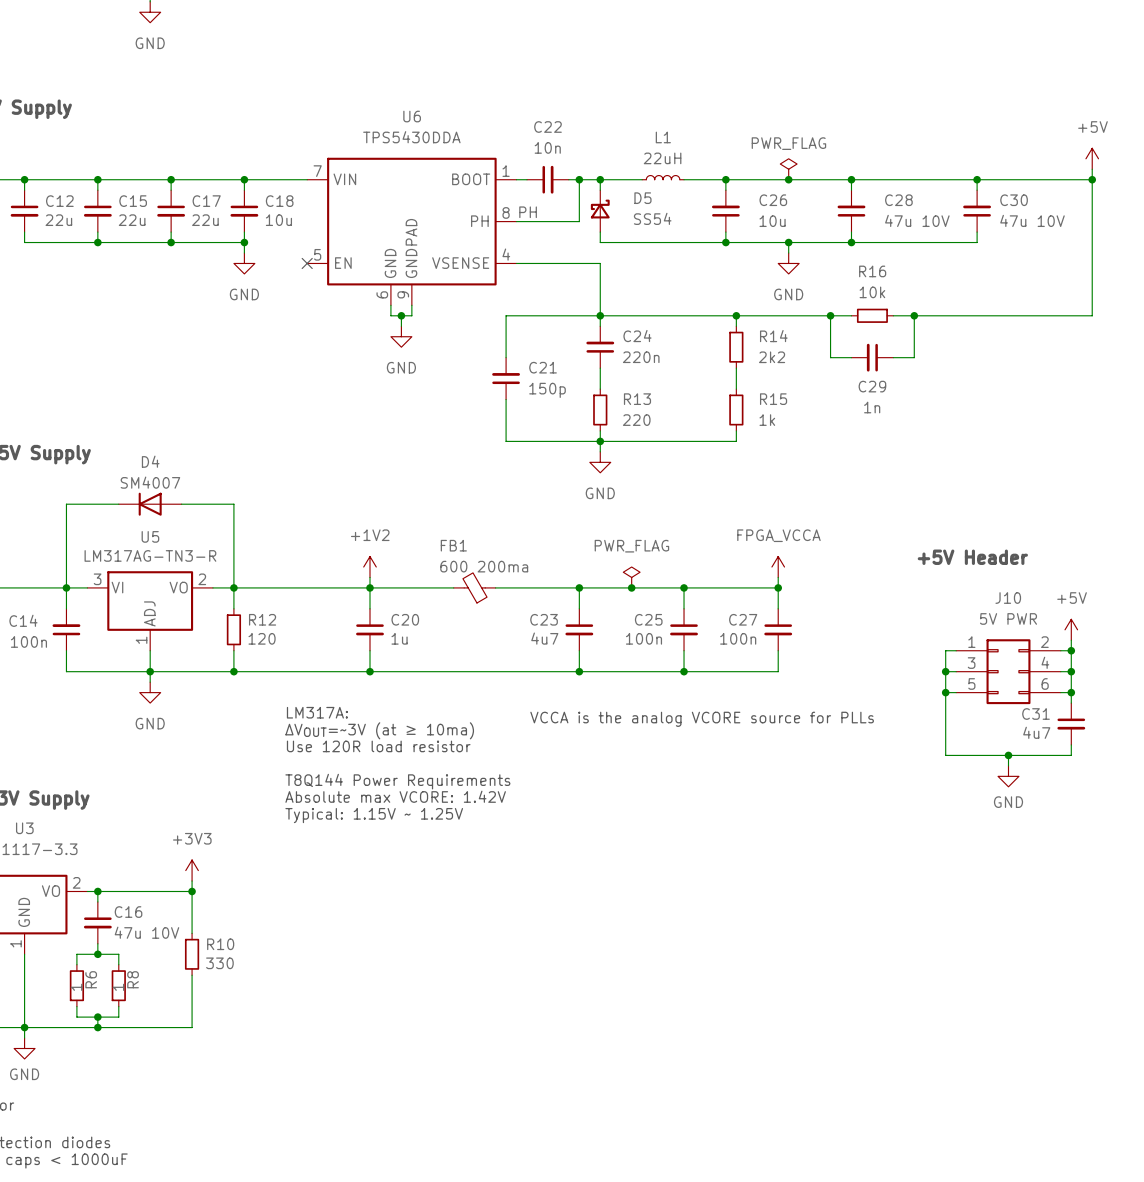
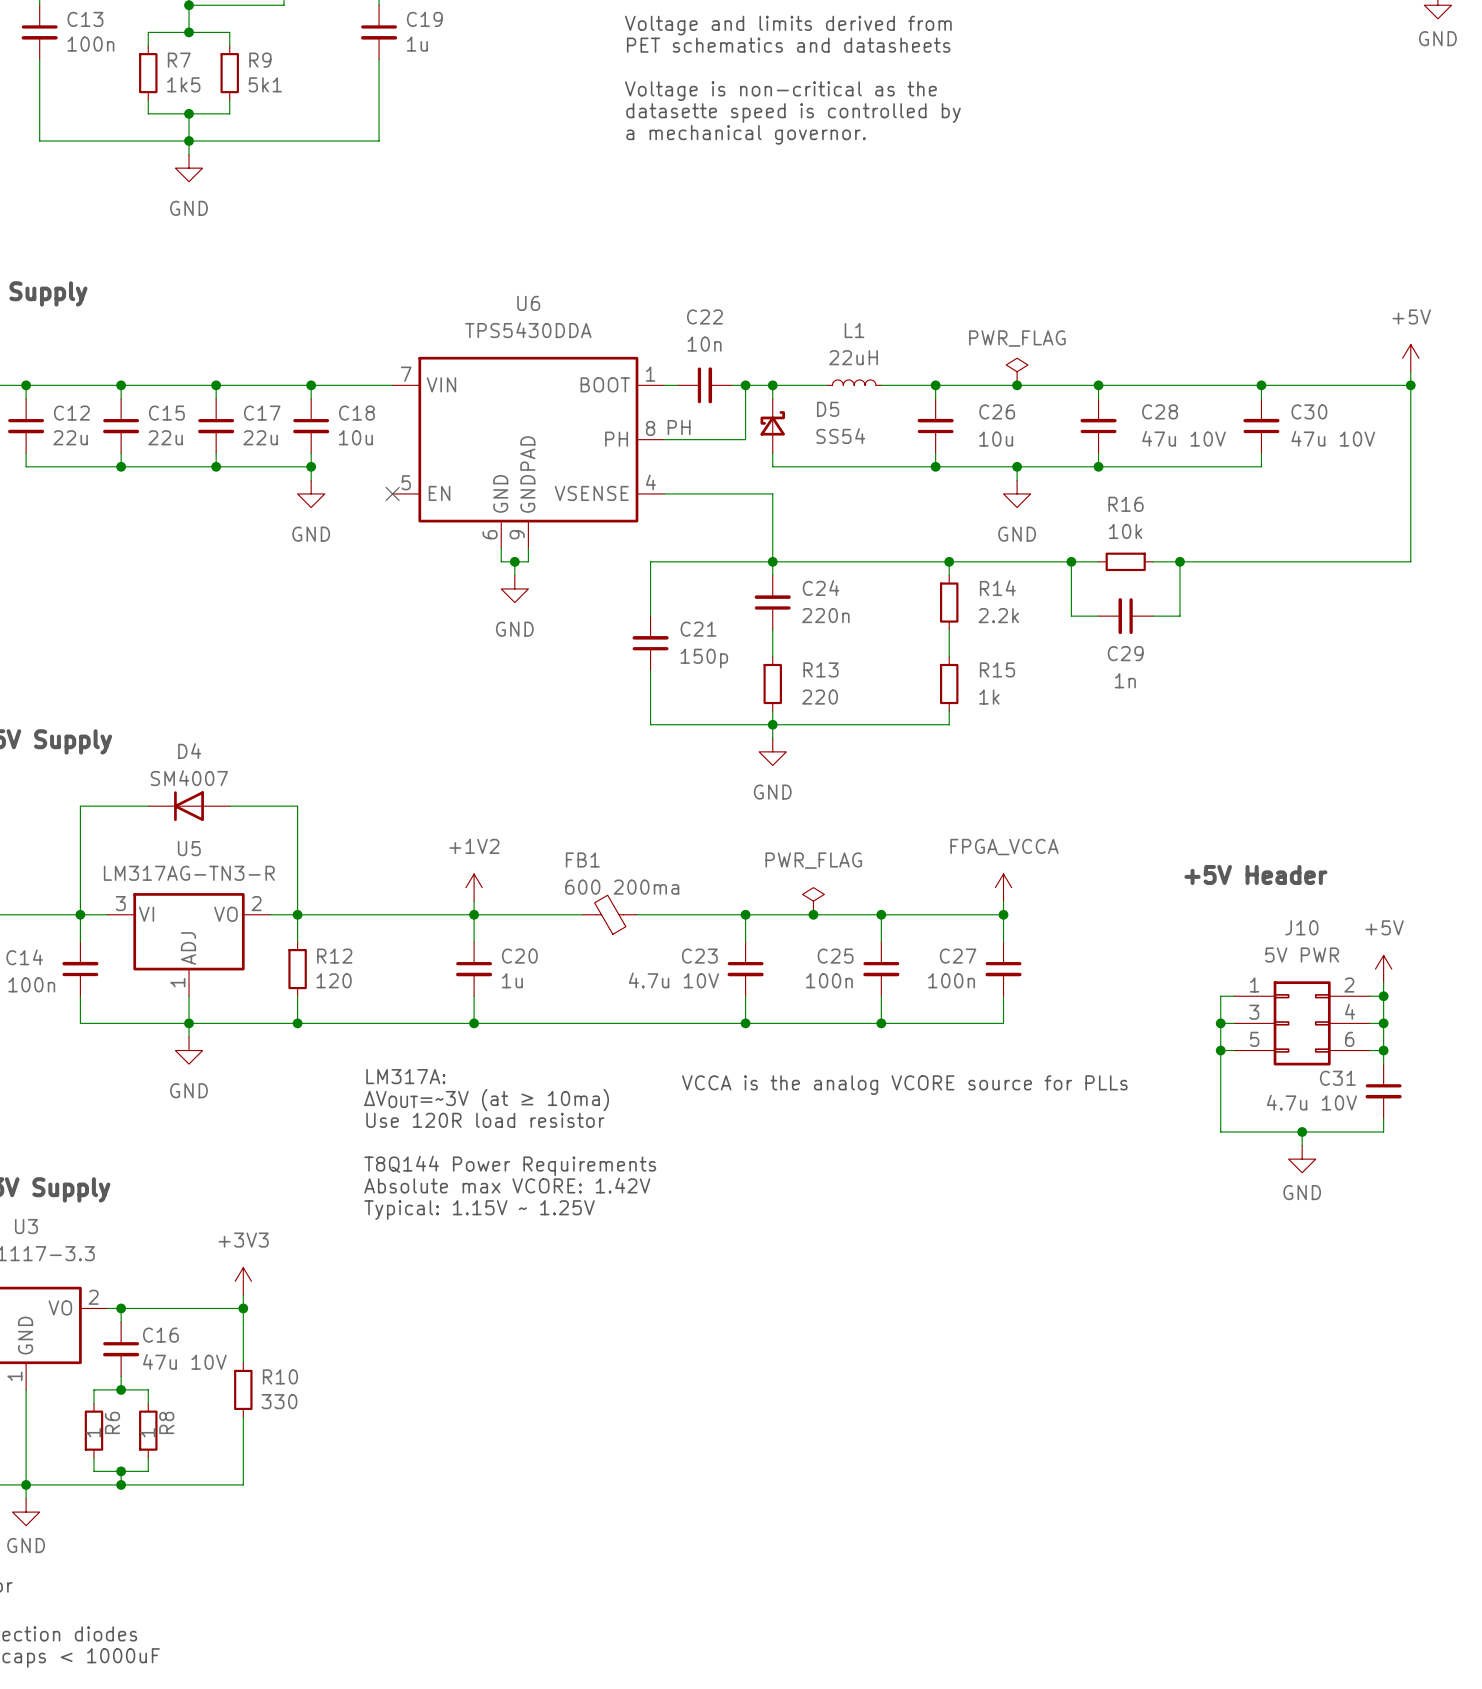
R14 value: 2k2 (772, 357) -> 2.2k (998, 615)
C23 value: 4u7 (544, 638) -> 4.7u 10V (673, 980)
C31 value: 4u7 (1036, 732) -> 4.7u 10V (1312, 1102)

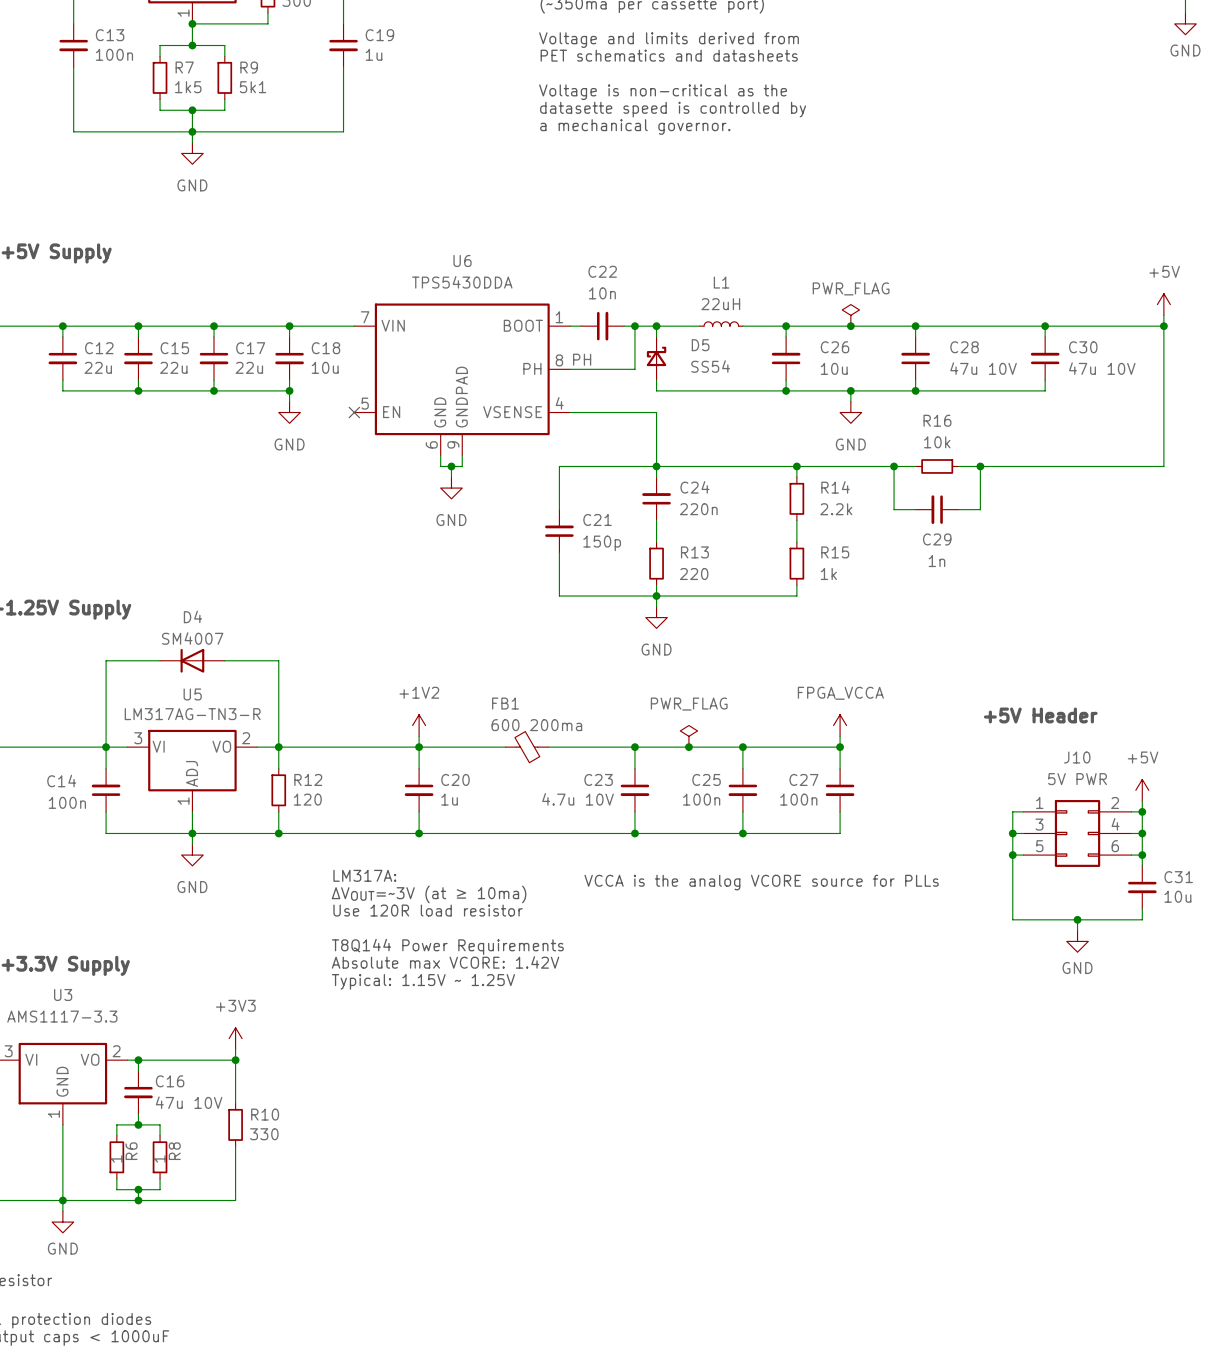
C31 name position: C31 (1337, 1078) -> C31 (1178, 877)
C31 value: 4.7u 10V (1312, 1102) -> 10u (1177, 896)

